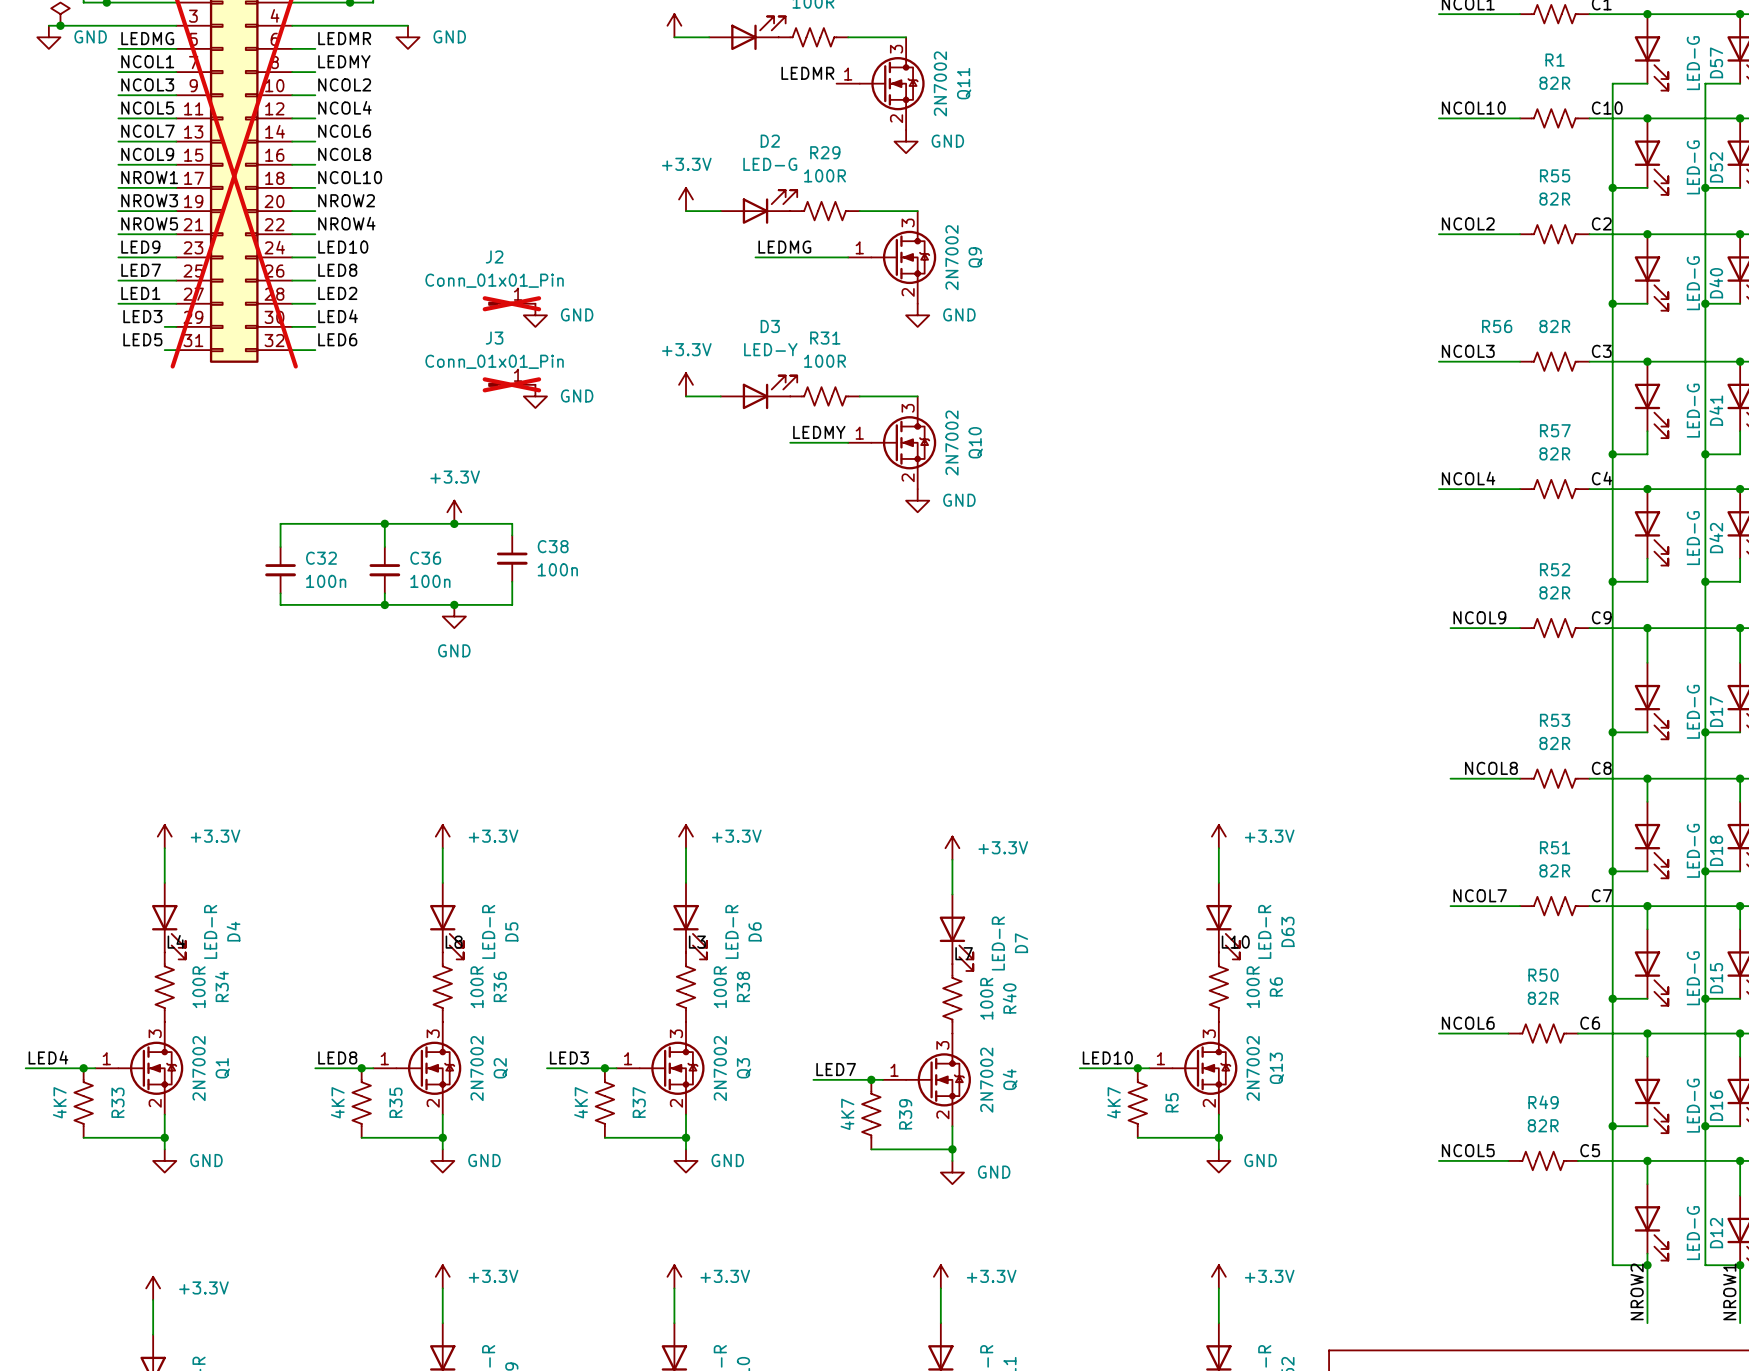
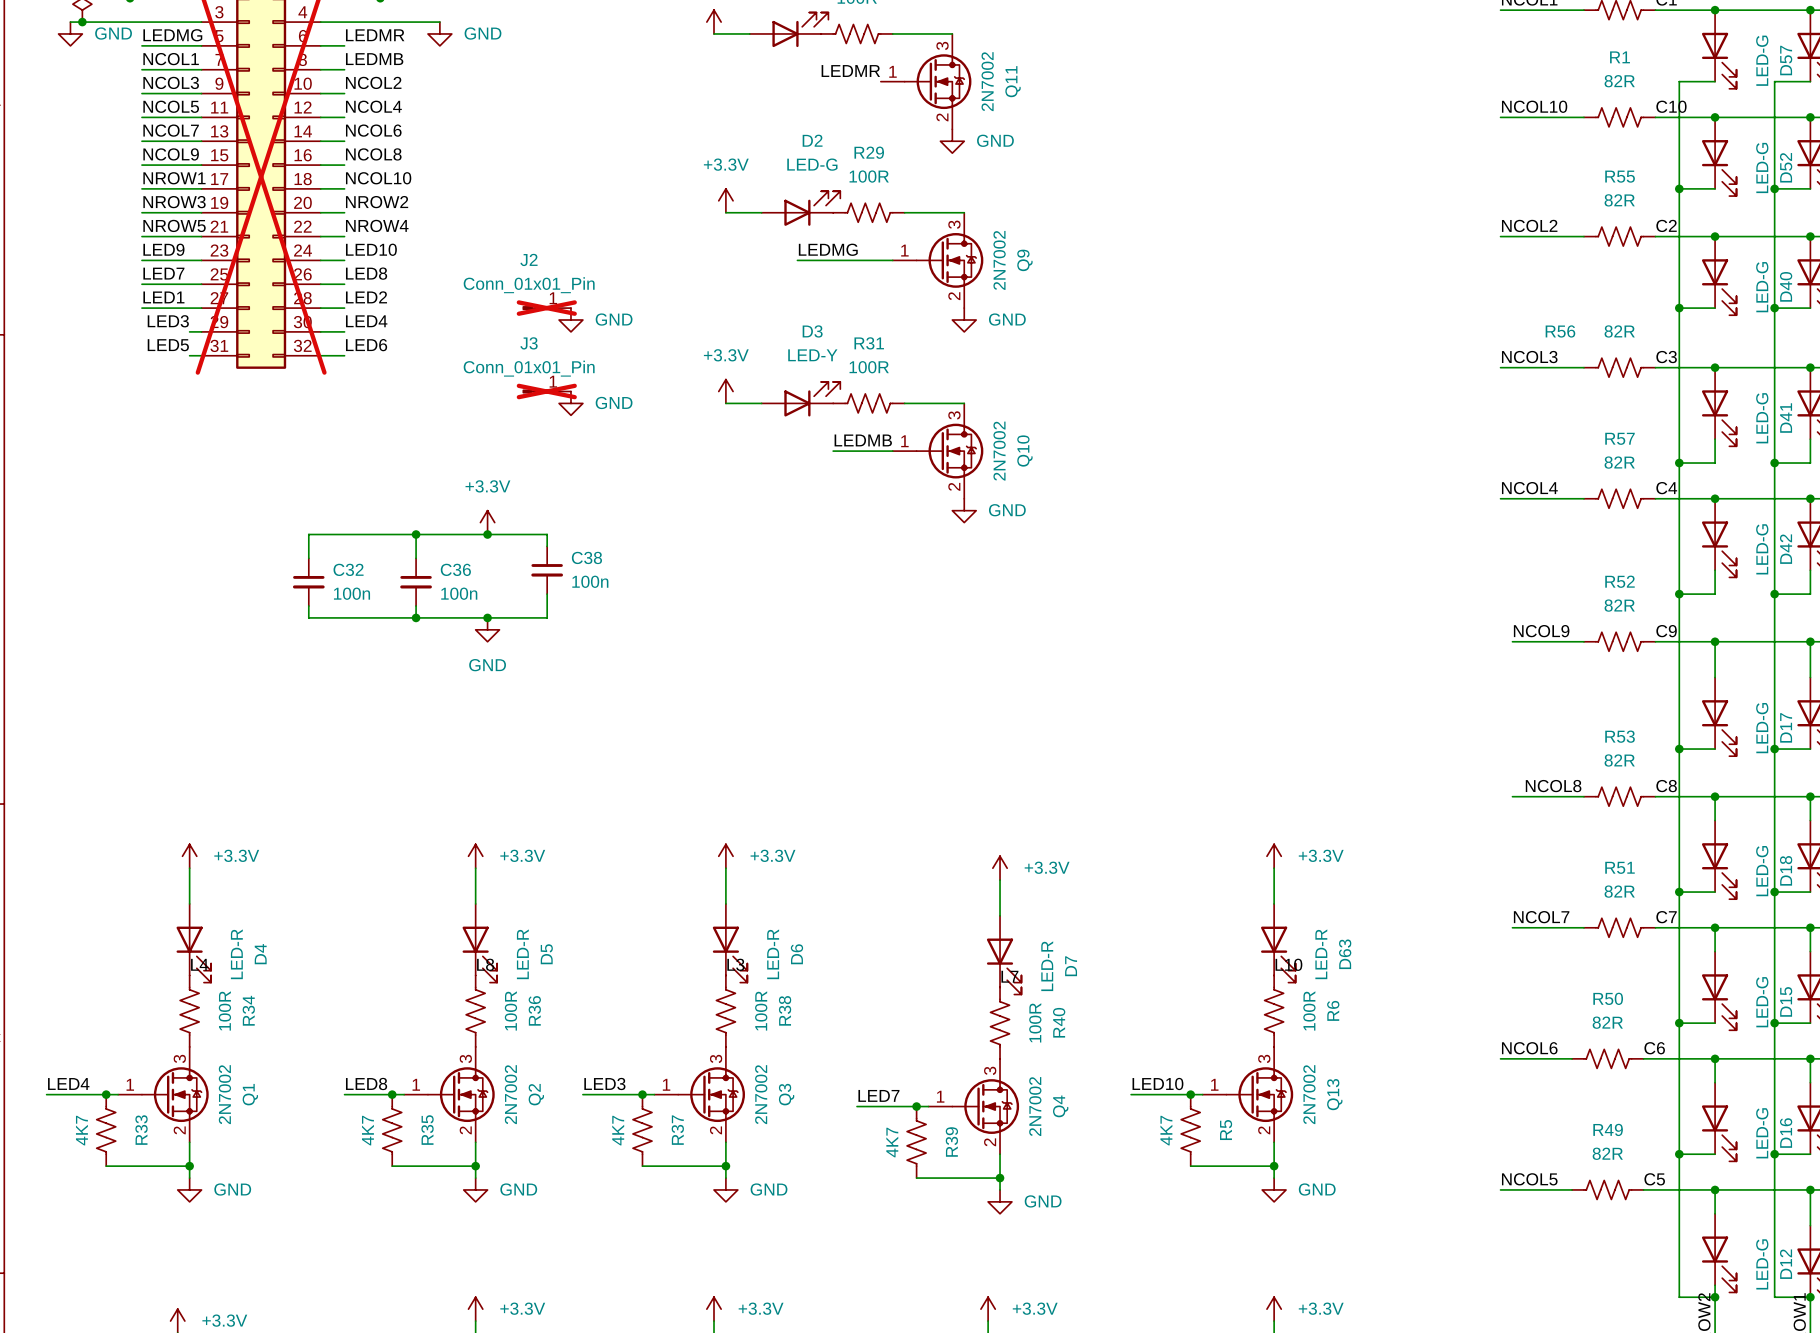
label: LEDMY (344, 61) -> LEDMB (374, 59)
label: LEDMY (819, 432) -> LEDMB (863, 440)

